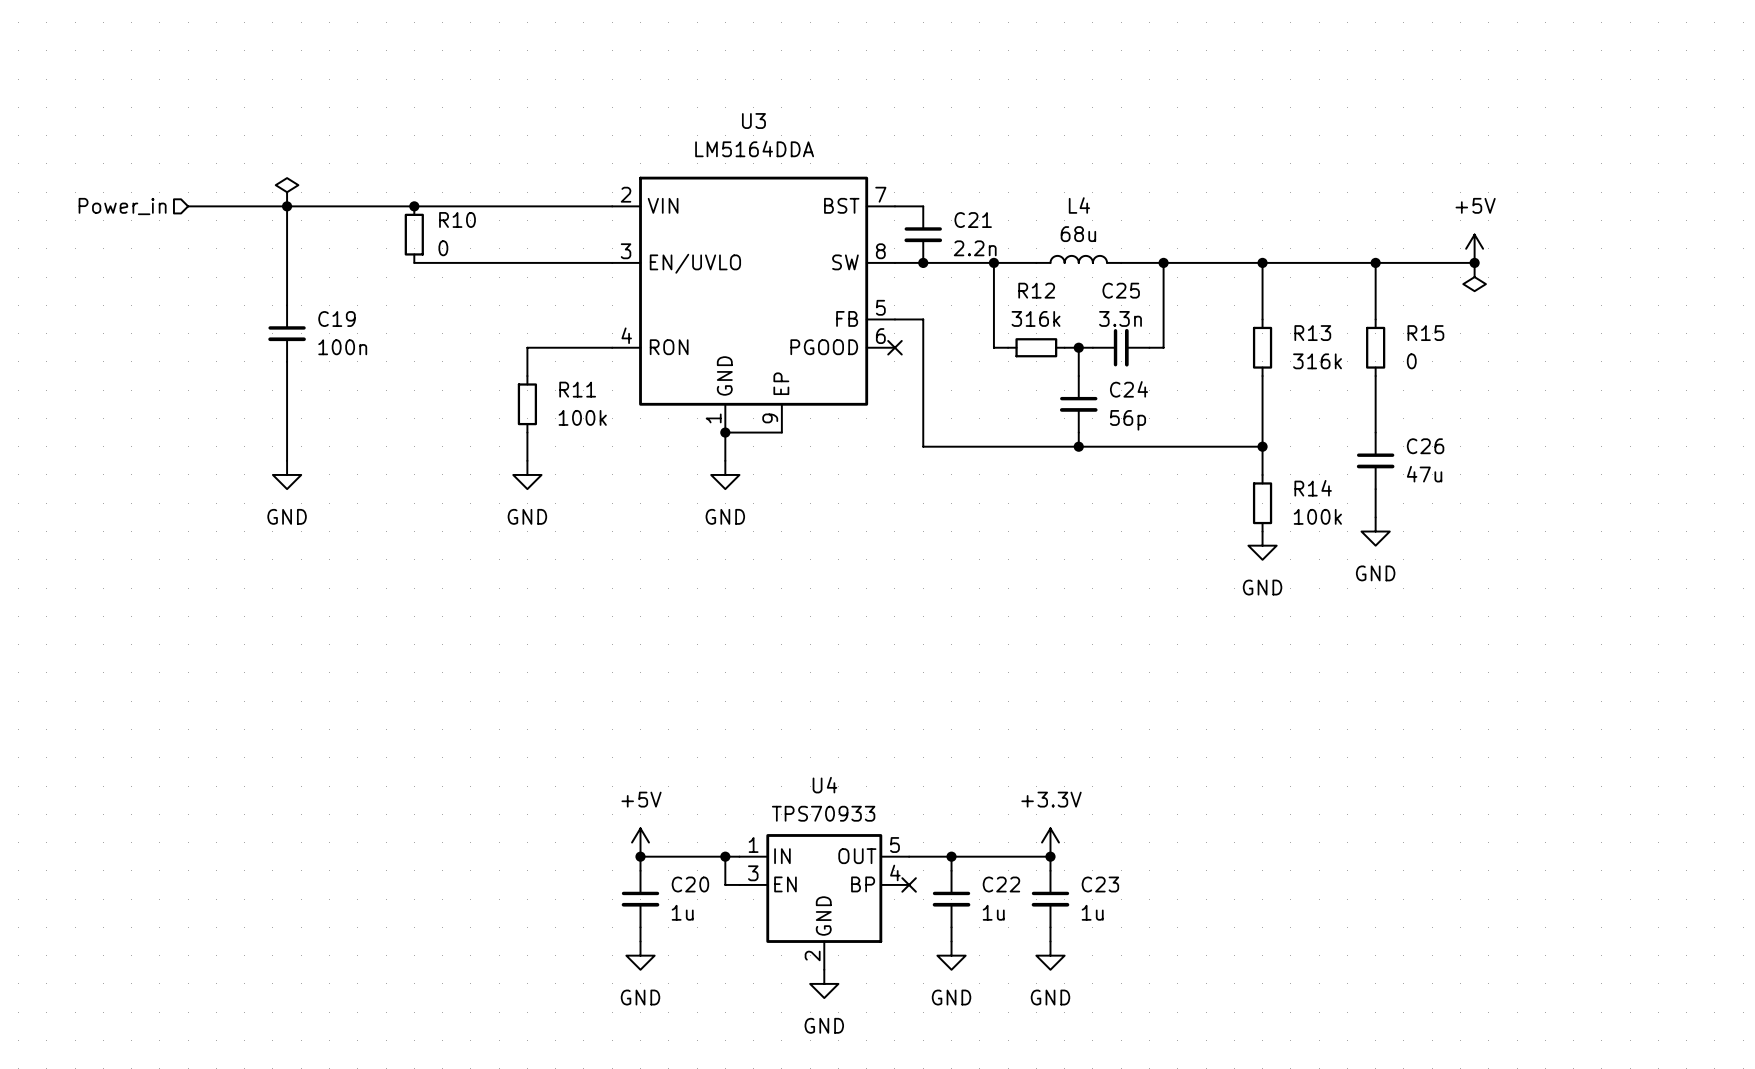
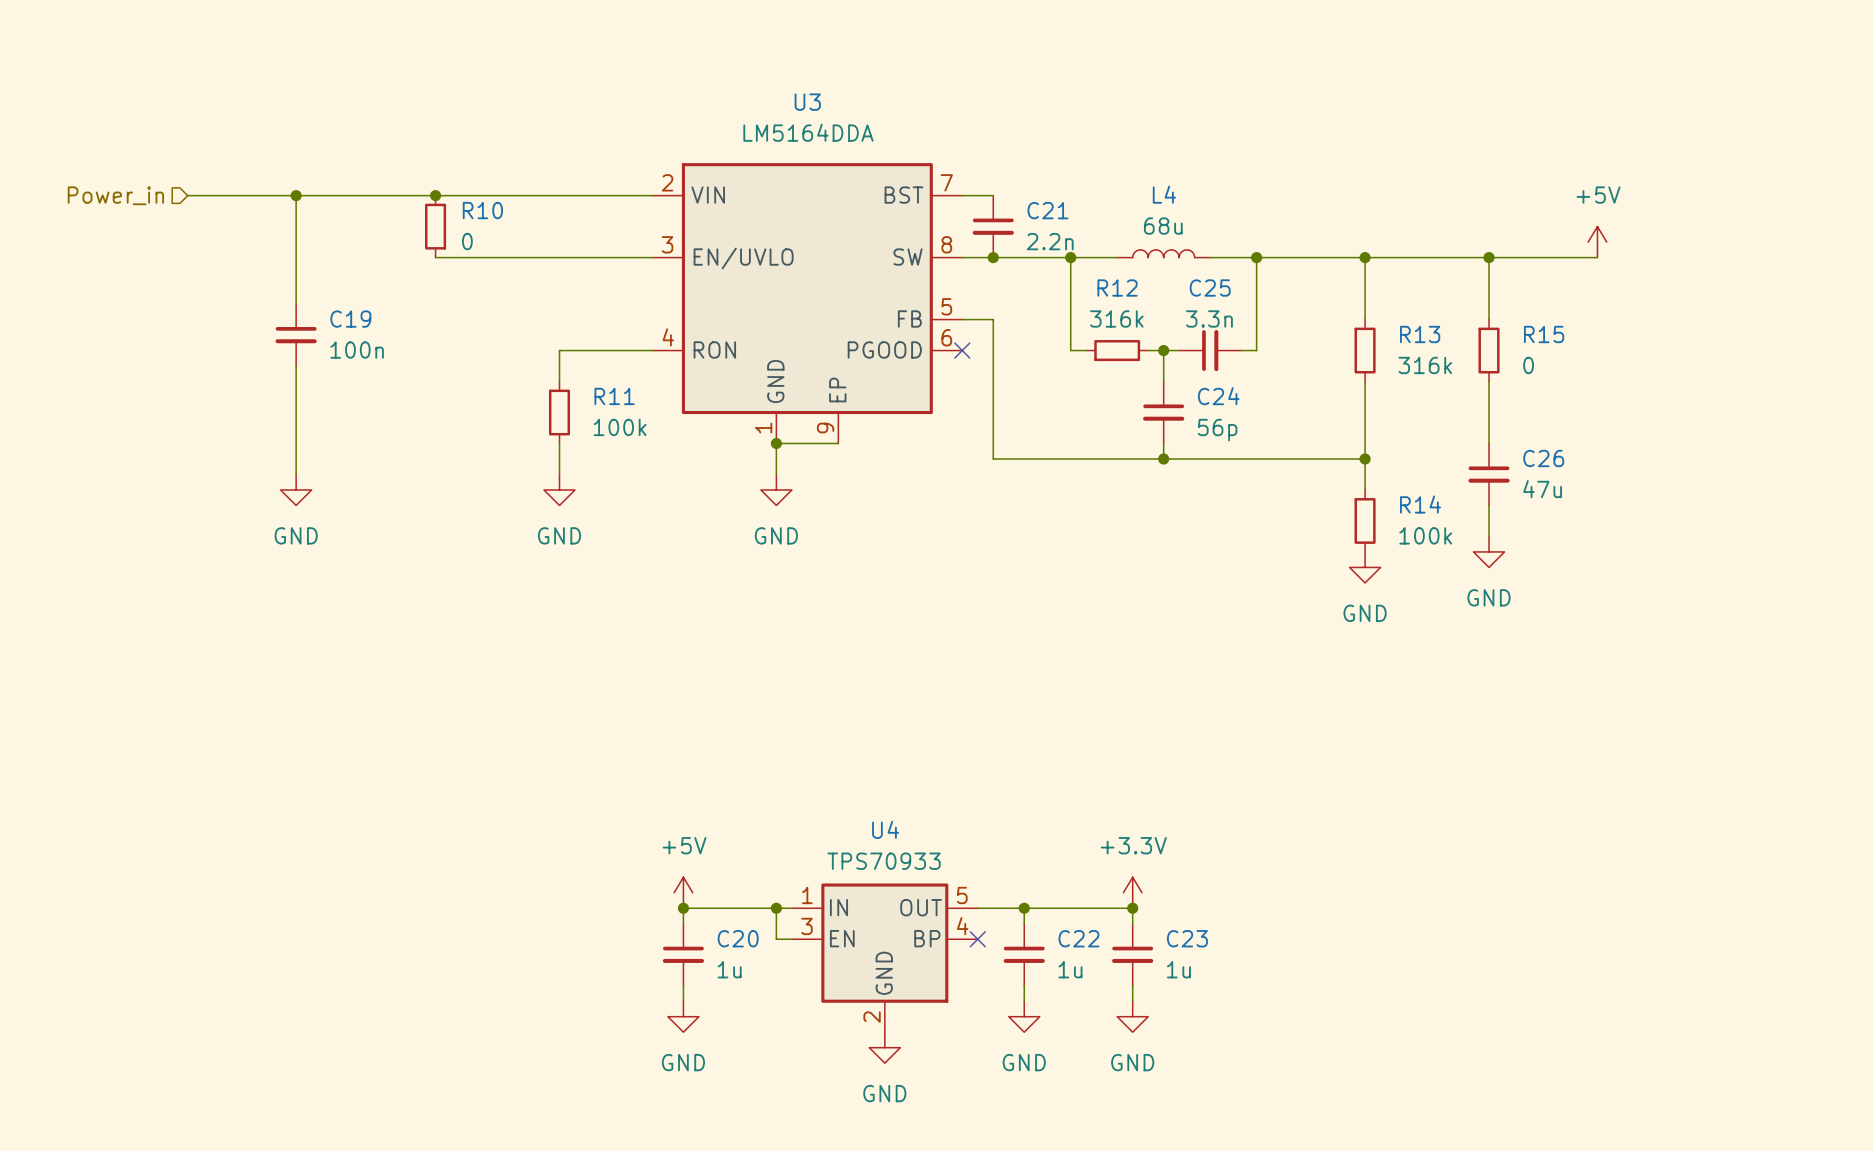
power symbol: (287, 192) -> none
junction: (1474, 262) -> none
power symbol: (1474, 277) -> none

